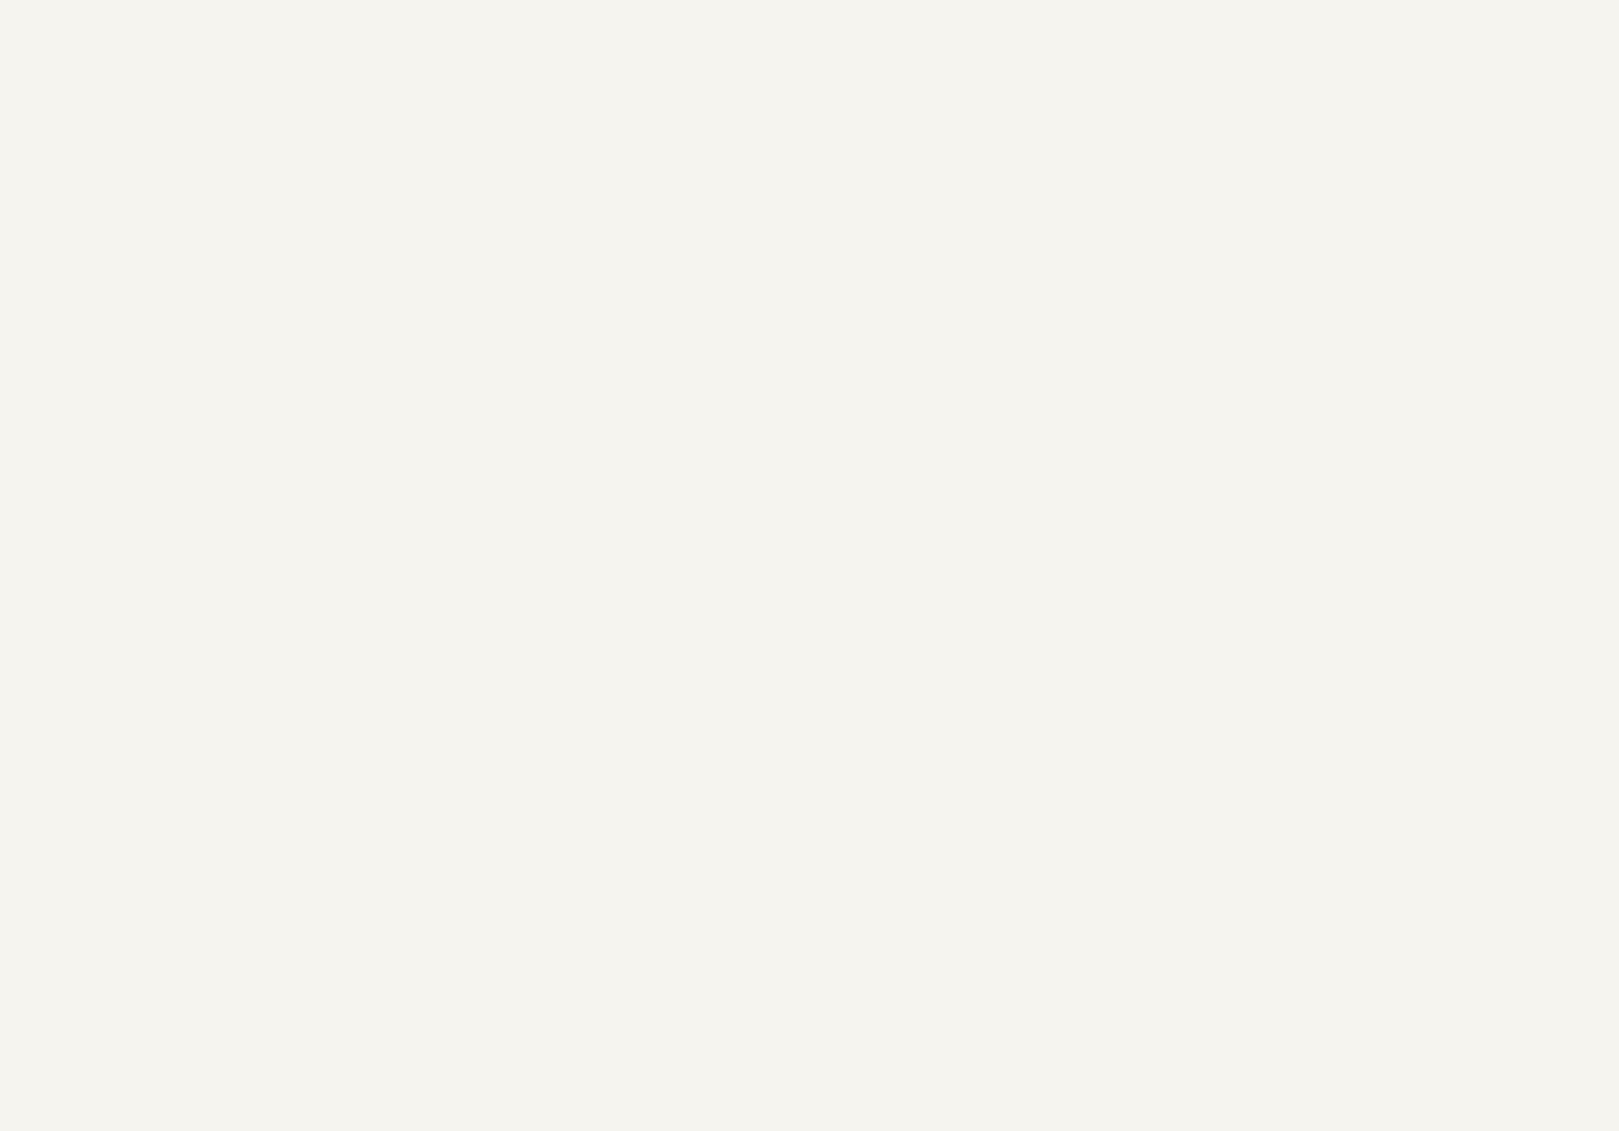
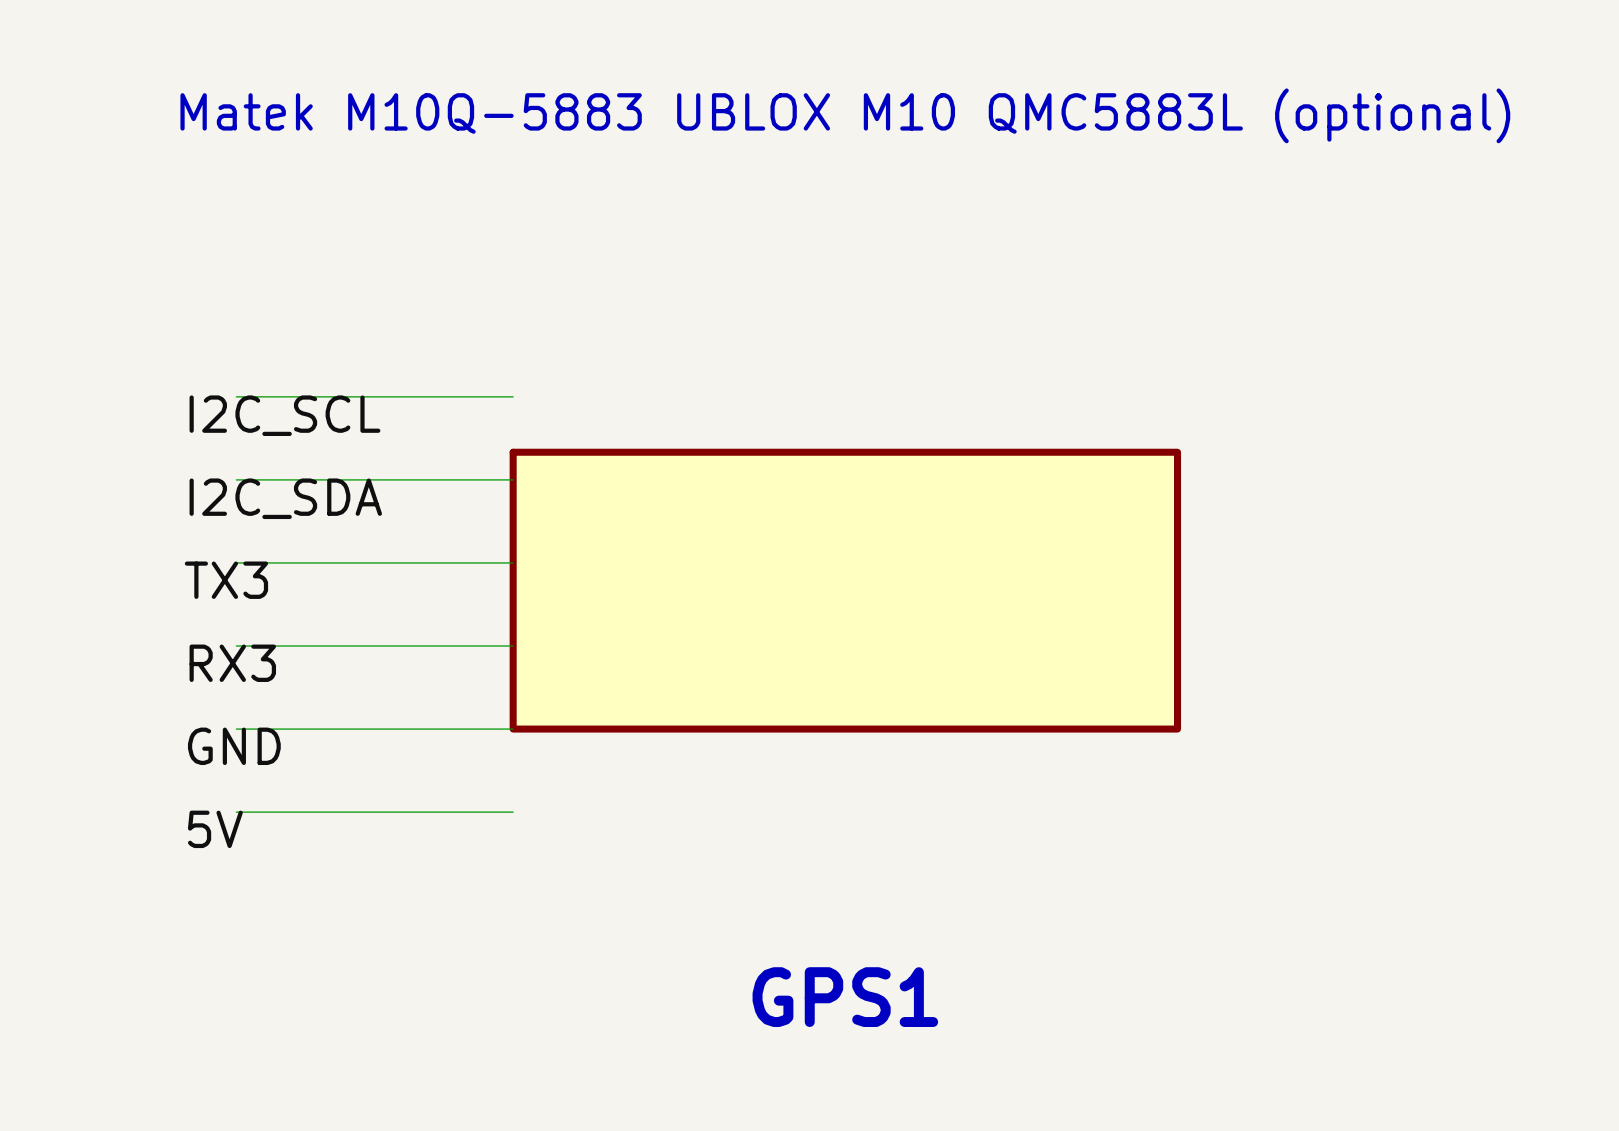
text: none -> Matek M10Q-5883 UBLOX M10 QMC5883L (optional) (845, 115)
wire: none -> (236, 396) (513, 396)
label: none -> I2C_SCL (284, 415)
wire: none -> (236, 479) (513, 479)
label: none -> I2C_SDA (285, 498)
wire: none -> (236, 562) (513, 562)
label: none -> TX3 (226, 580)
part: none -> (845, 590)
wire: none -> (236, 646) (513, 646)
label: none -> RX3 (232, 663)
wire: none -> (236, 729) (513, 729)
label: none -> GND (234, 746)
wire: none -> (236, 812) (513, 812)
label: none -> 5V (215, 829)
text: none -> GPS1 (845, 997)

